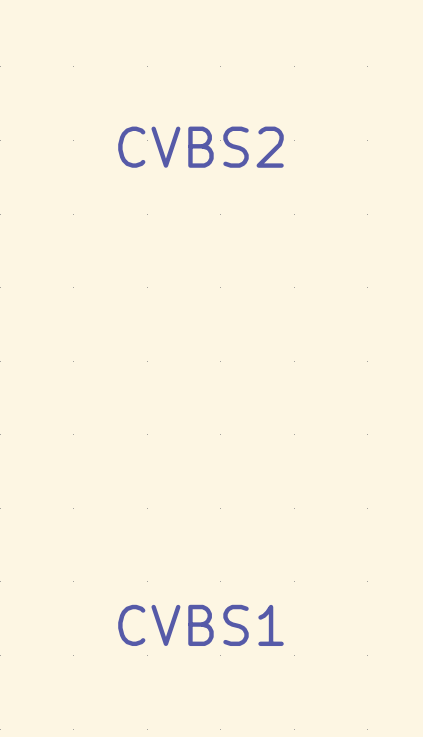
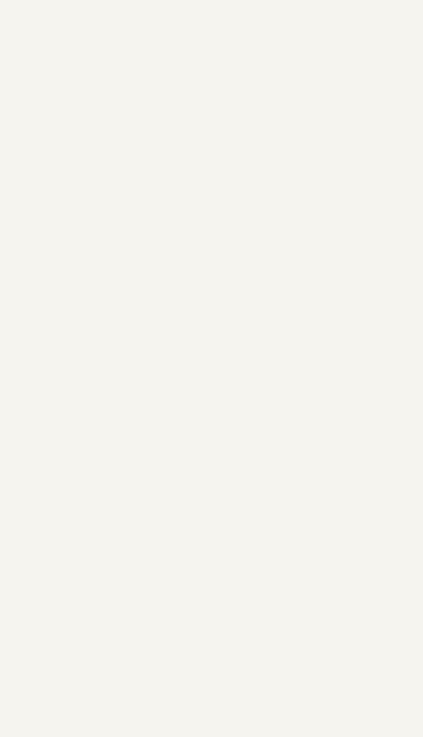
text: CVBS2 (200, 147) -> none
text: CVBS1 (200, 625) -> none

